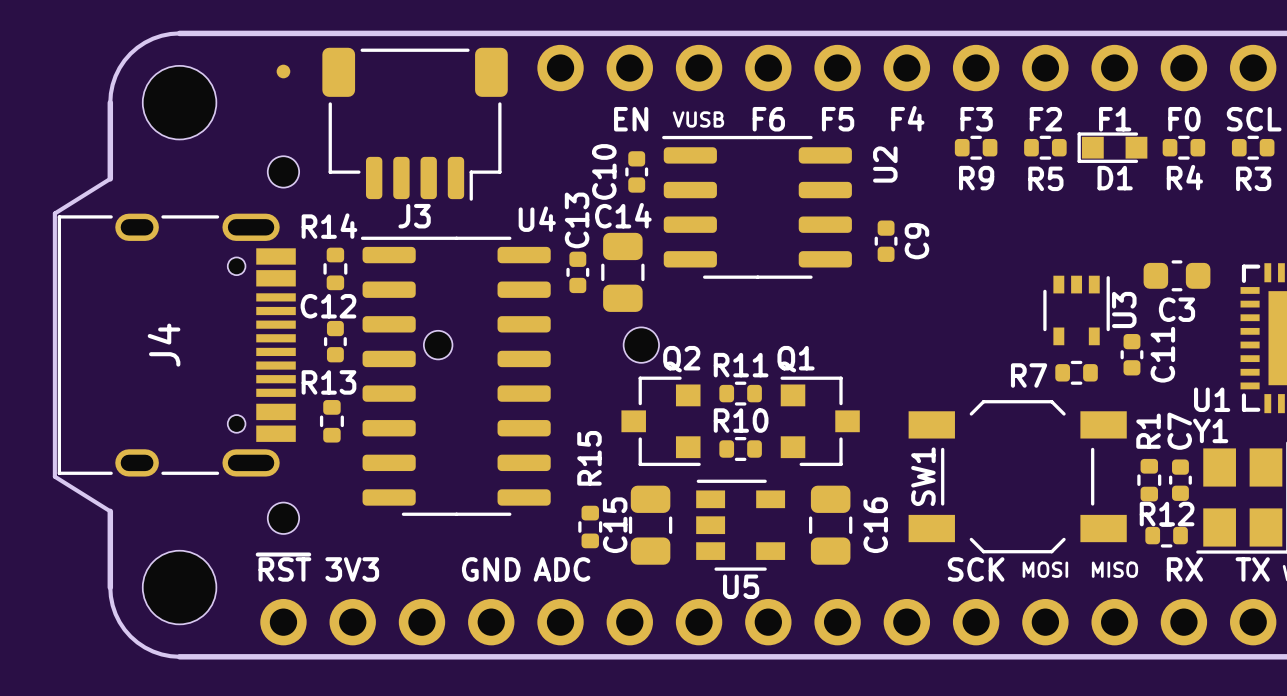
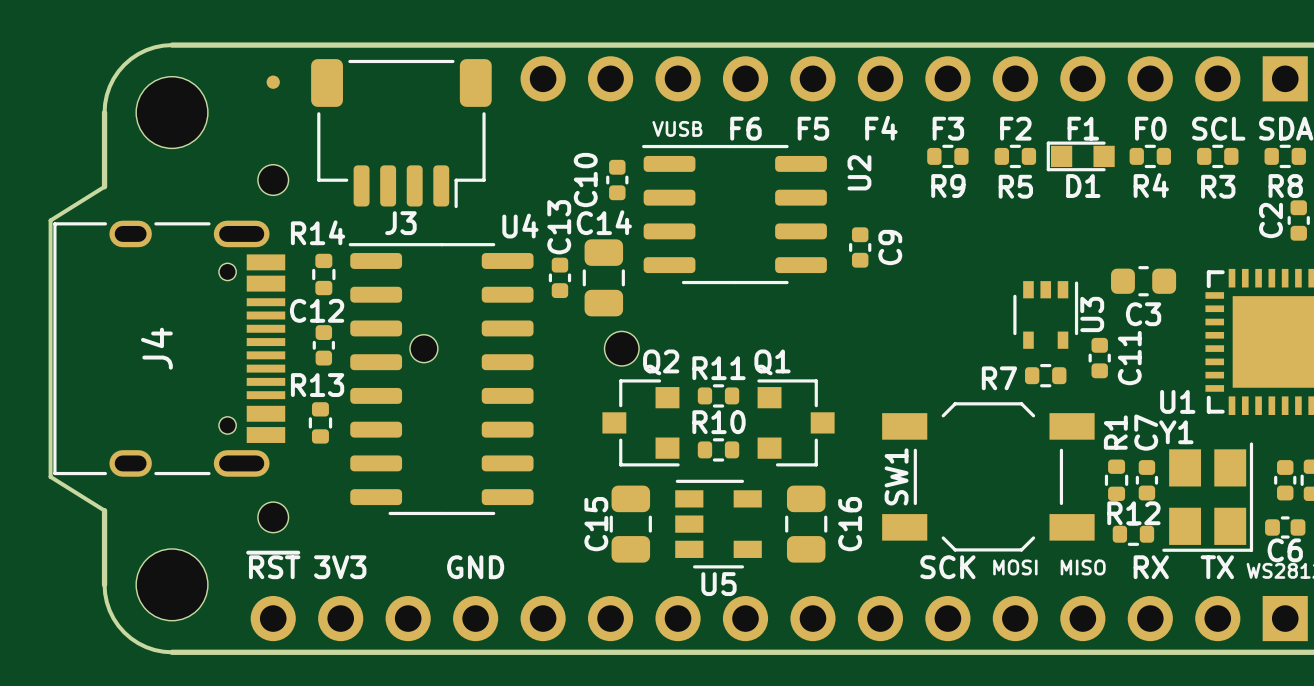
text: EN (631, 119) -> none
R15: (590, 526) -> none
text: ADC (562, 569) -> none

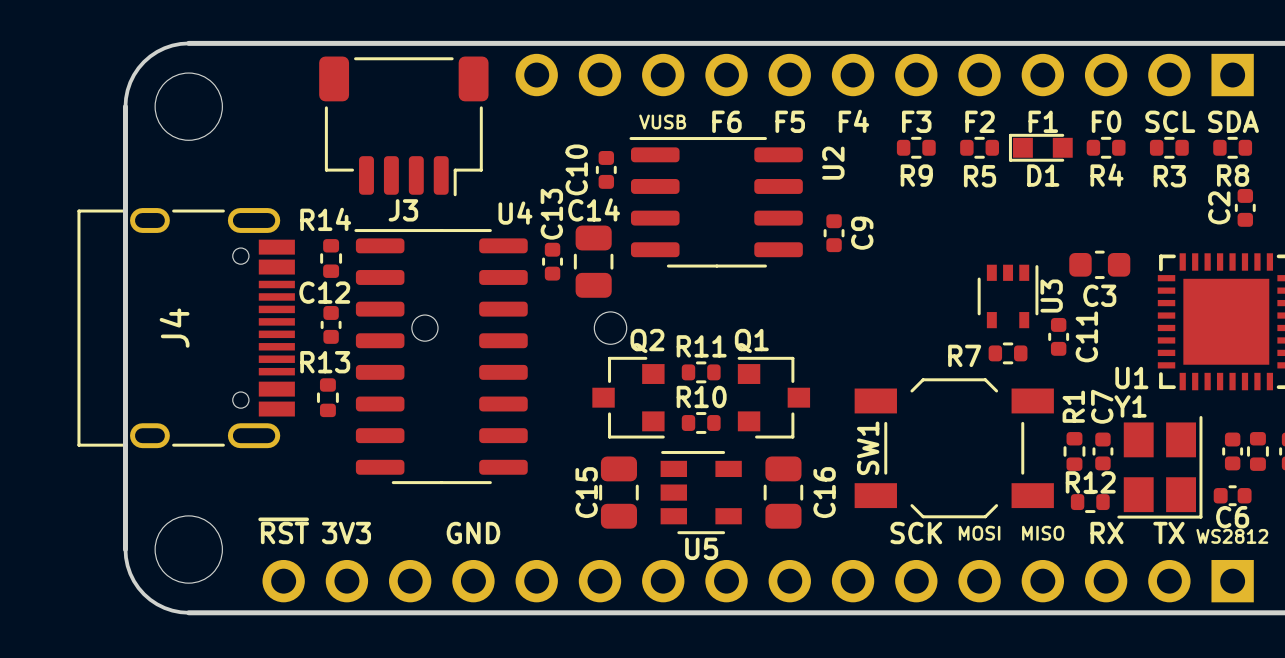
part: (273, 82) -> none
part: (273, 180) -> none
board edge: (104, 186) (50, 220) (50, 476) (104, 510) -> (125, 176) (125, 479)
part: (273, 517) -> none

